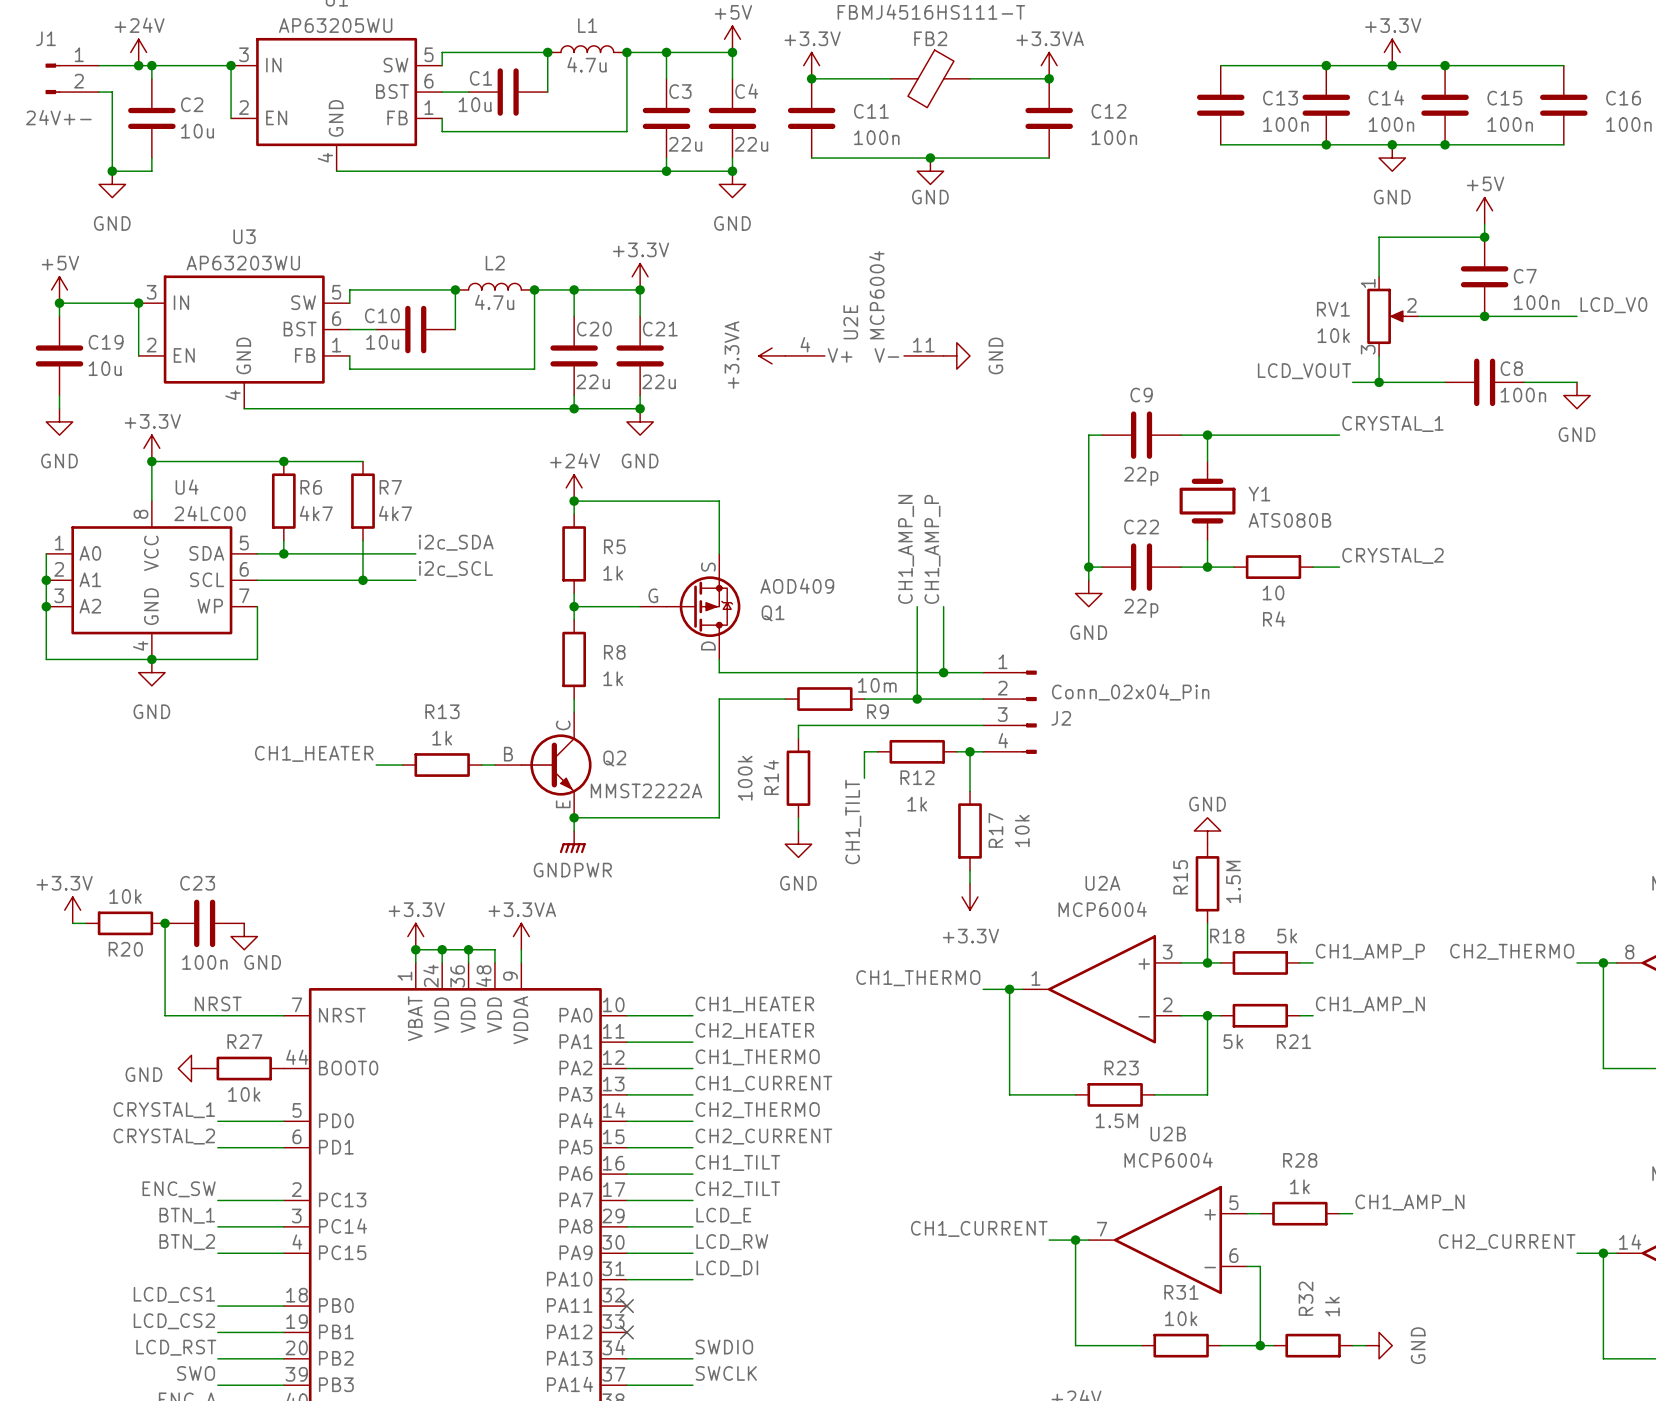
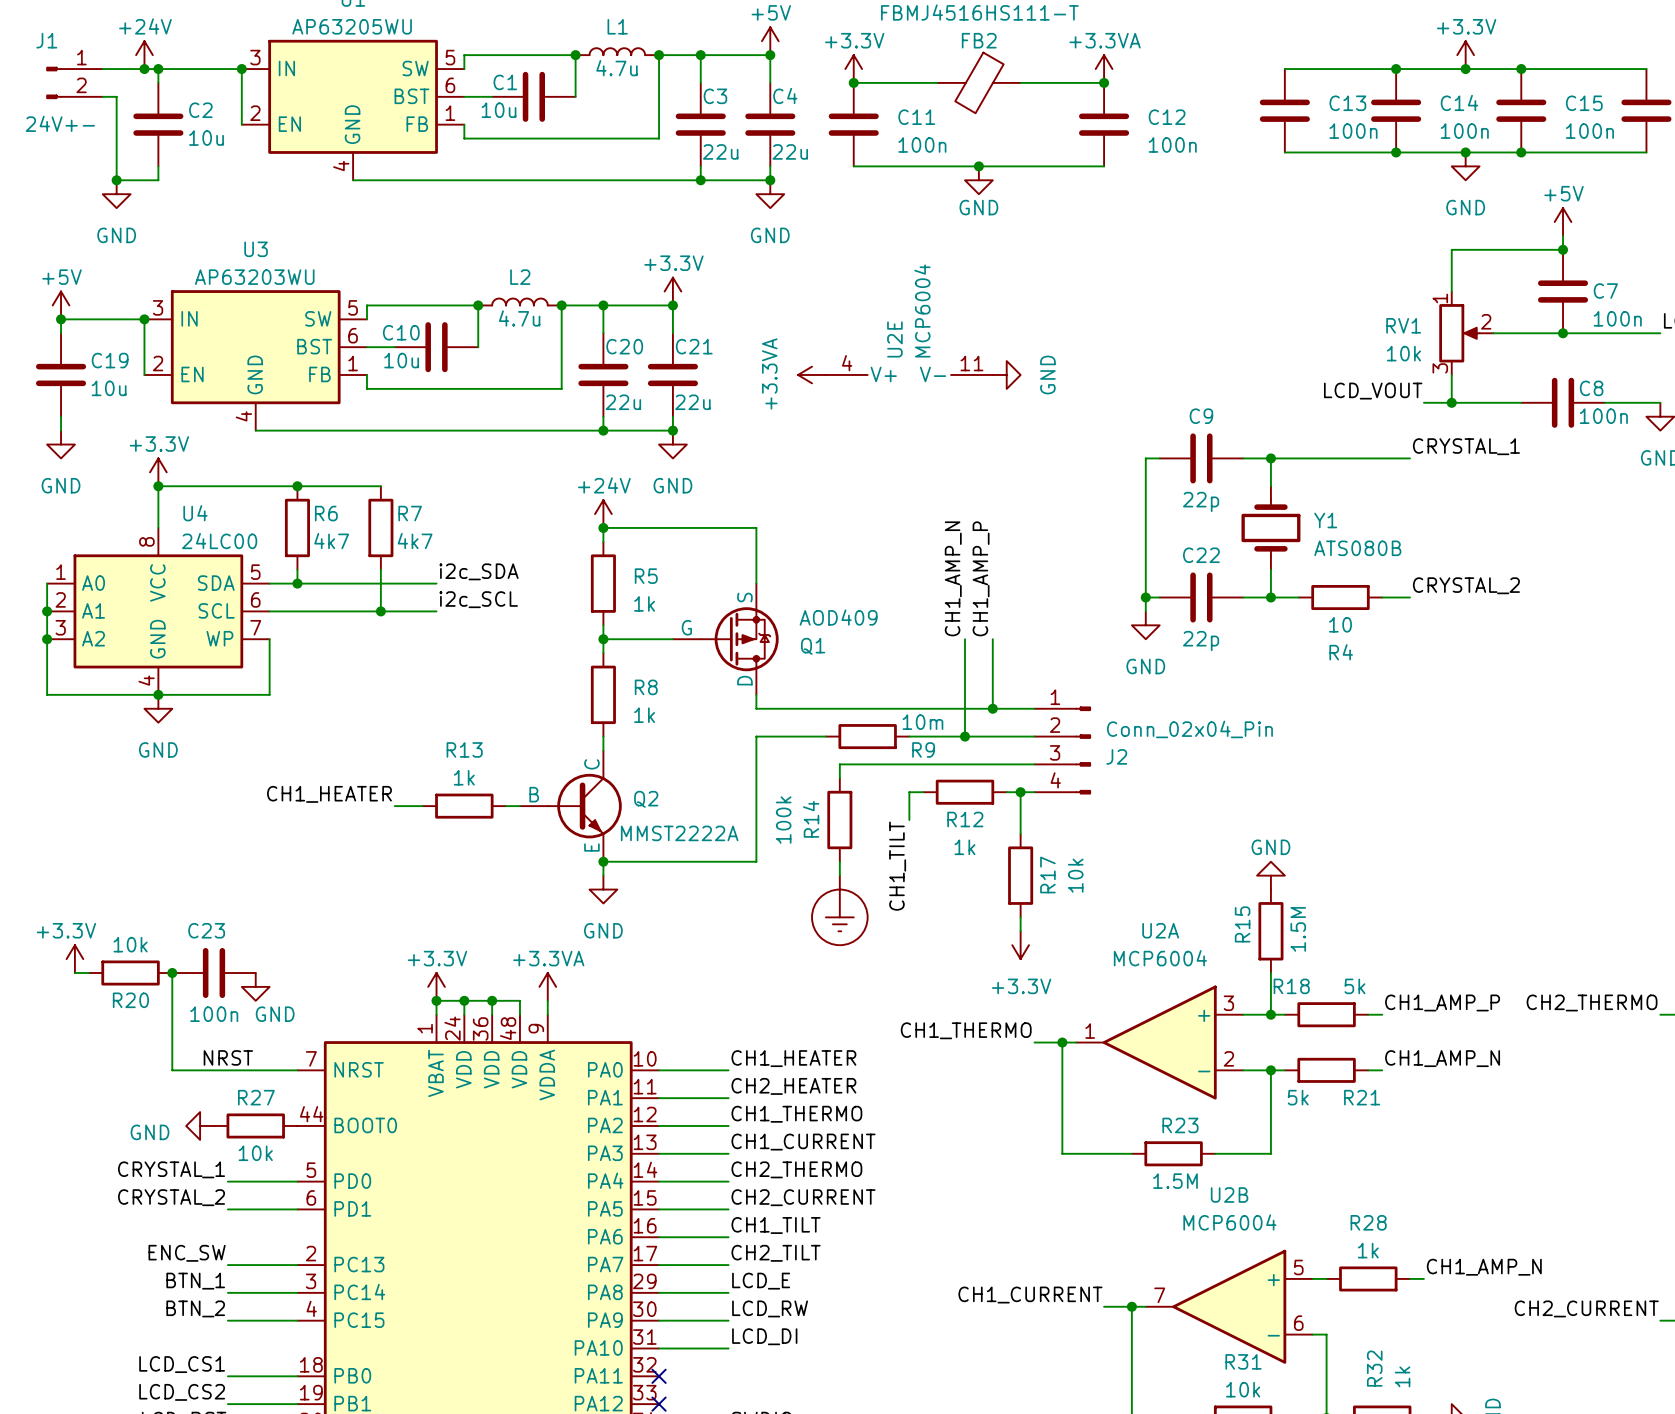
power symbol: GNDPWR (572, 842) -> GND (603, 889)
power symbol: GND (798, 844) -> none
power symbol: none -> (839, 910)

